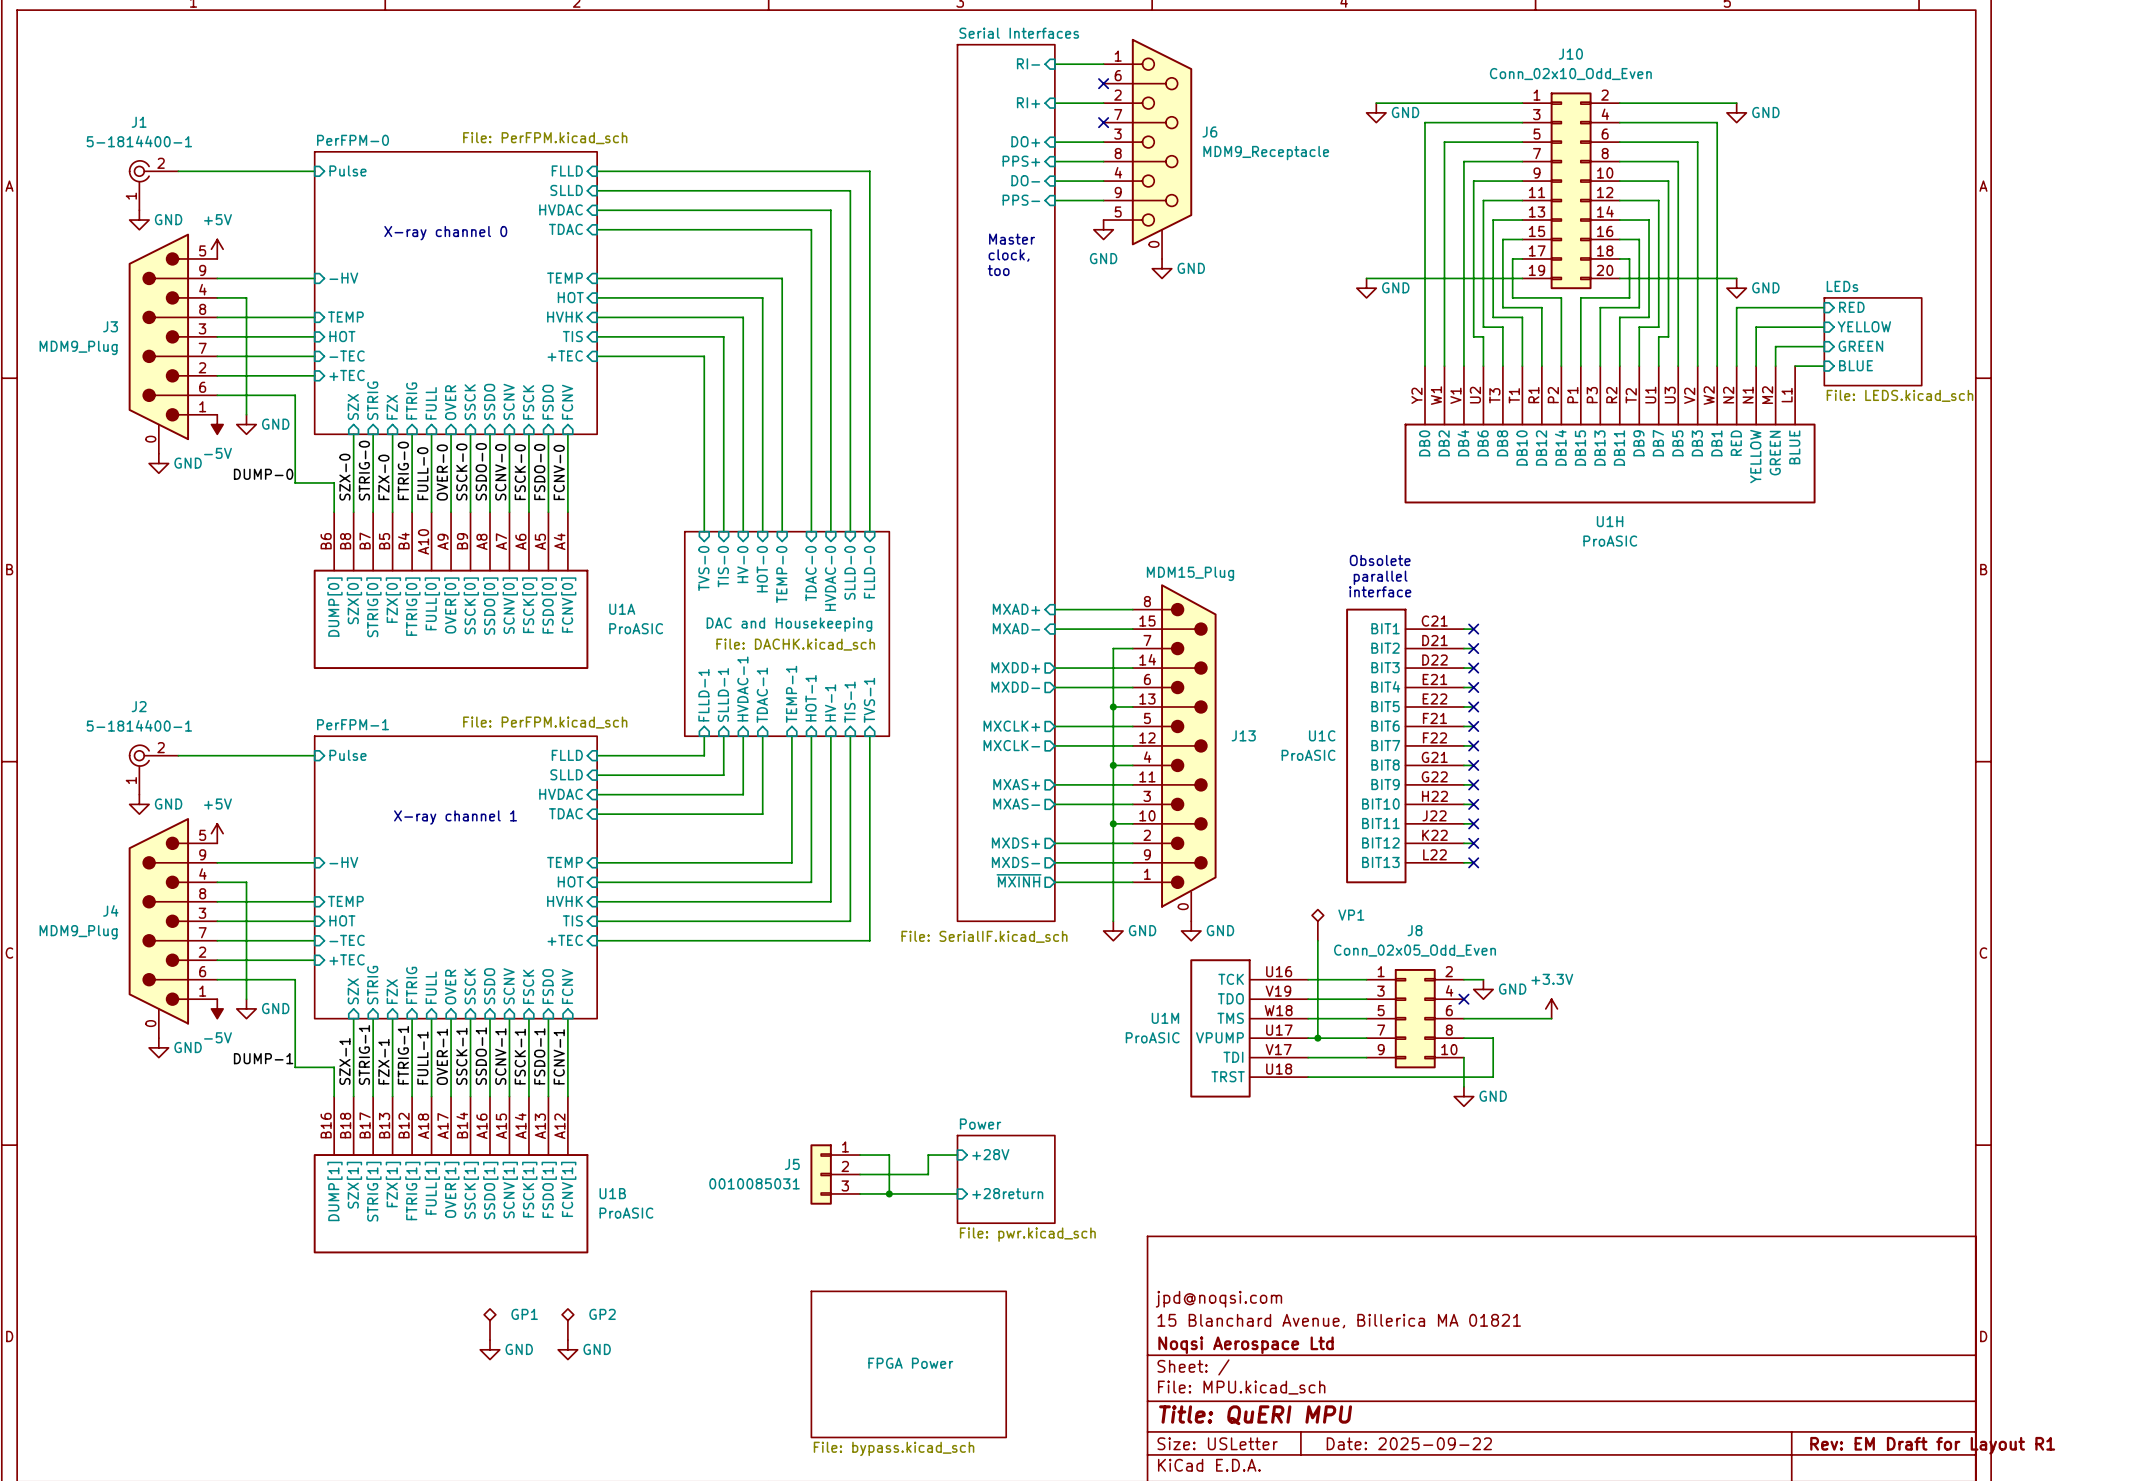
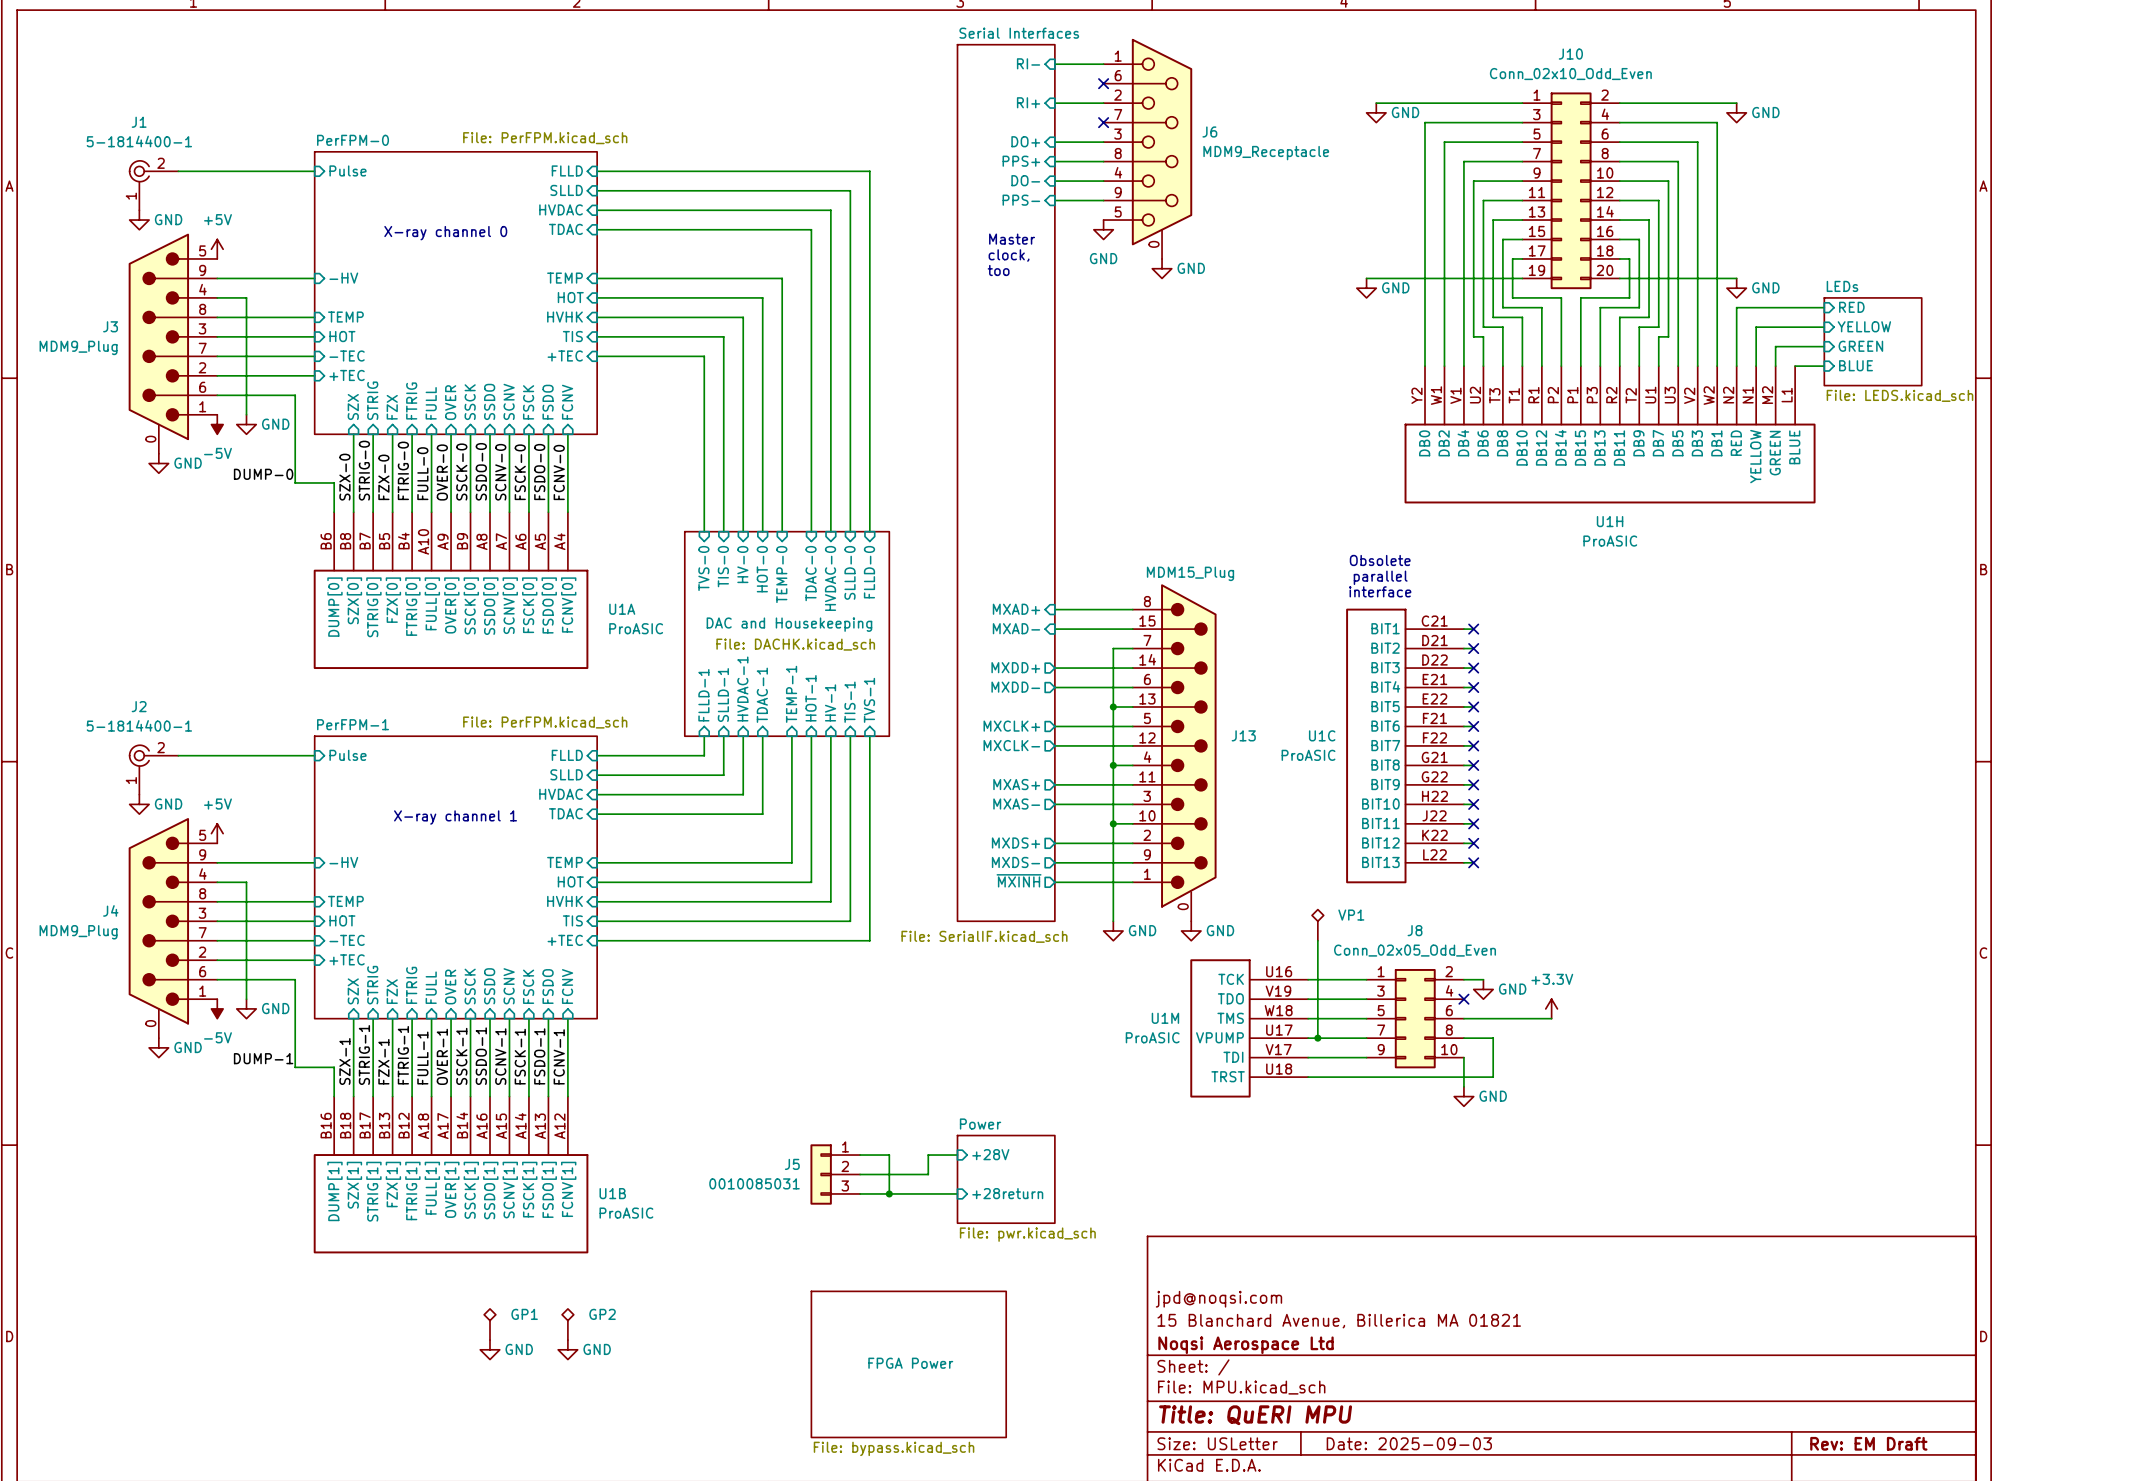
title block: Date: 2025-09-22 (1409, 1443) -> Date: 2025-09-03 (1409, 1443)
title block: Rev: EM Draft for Layout R1 (1932, 1445) -> Rev: EM Draft (1868, 1443)

